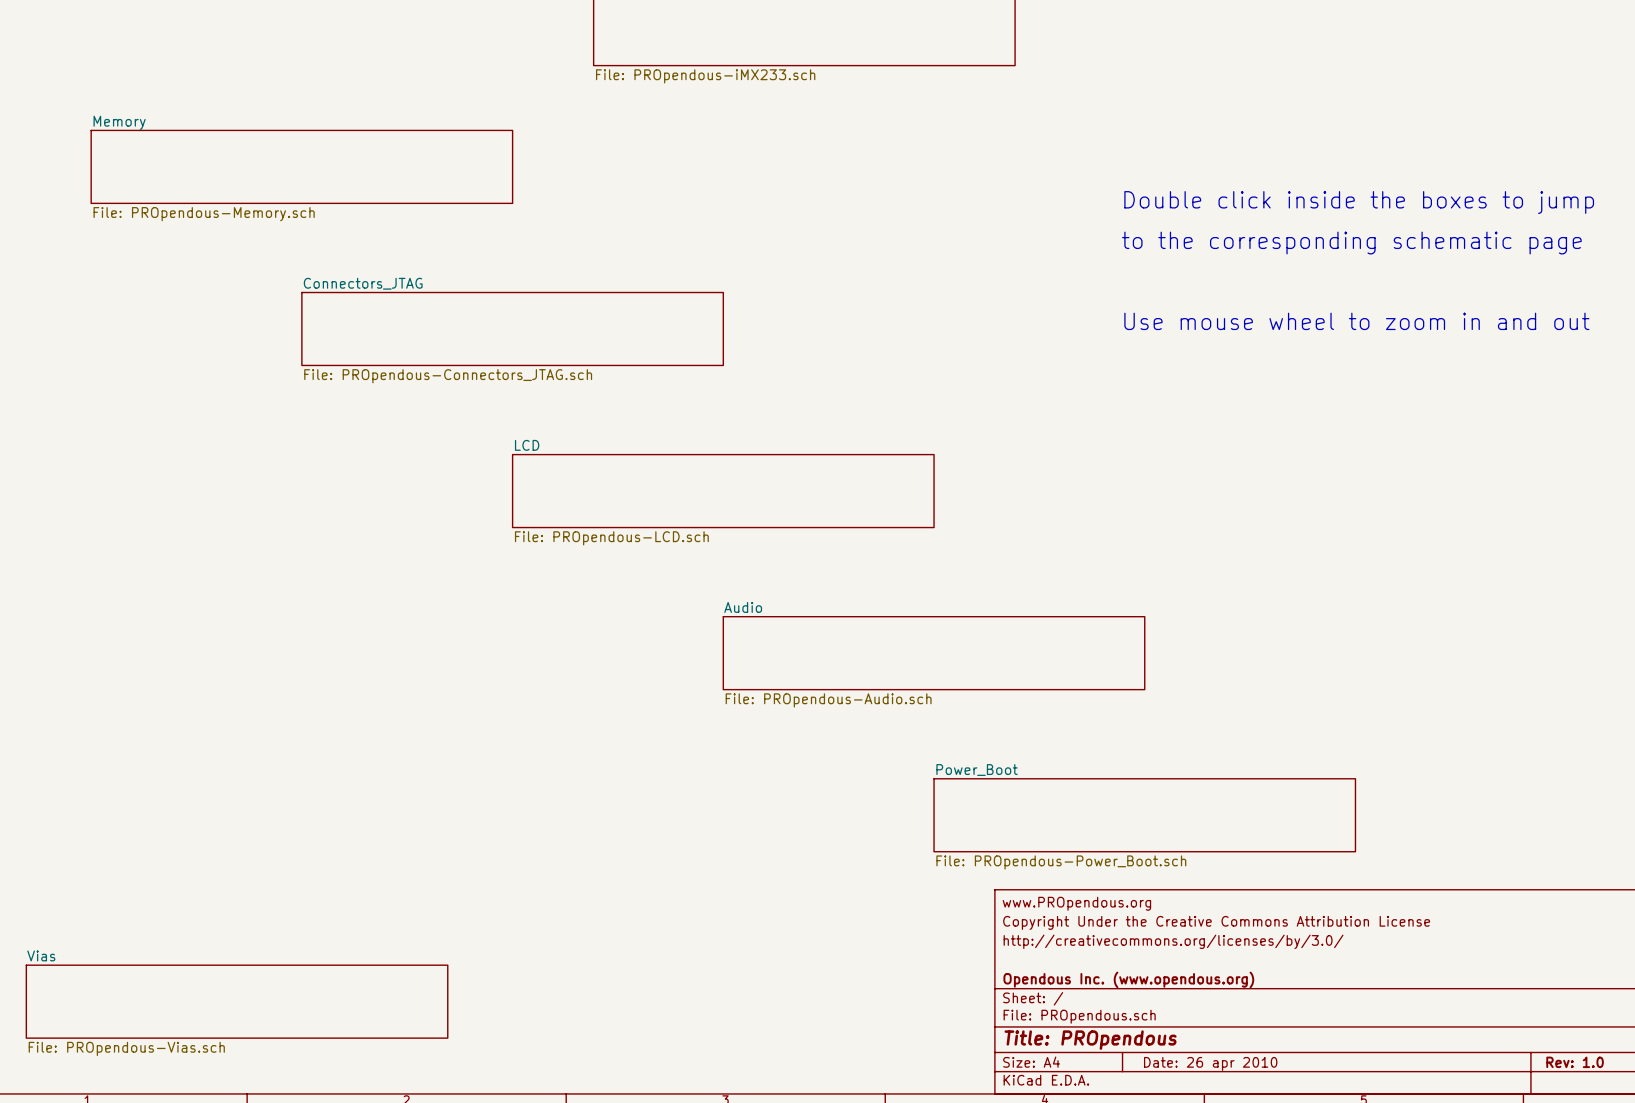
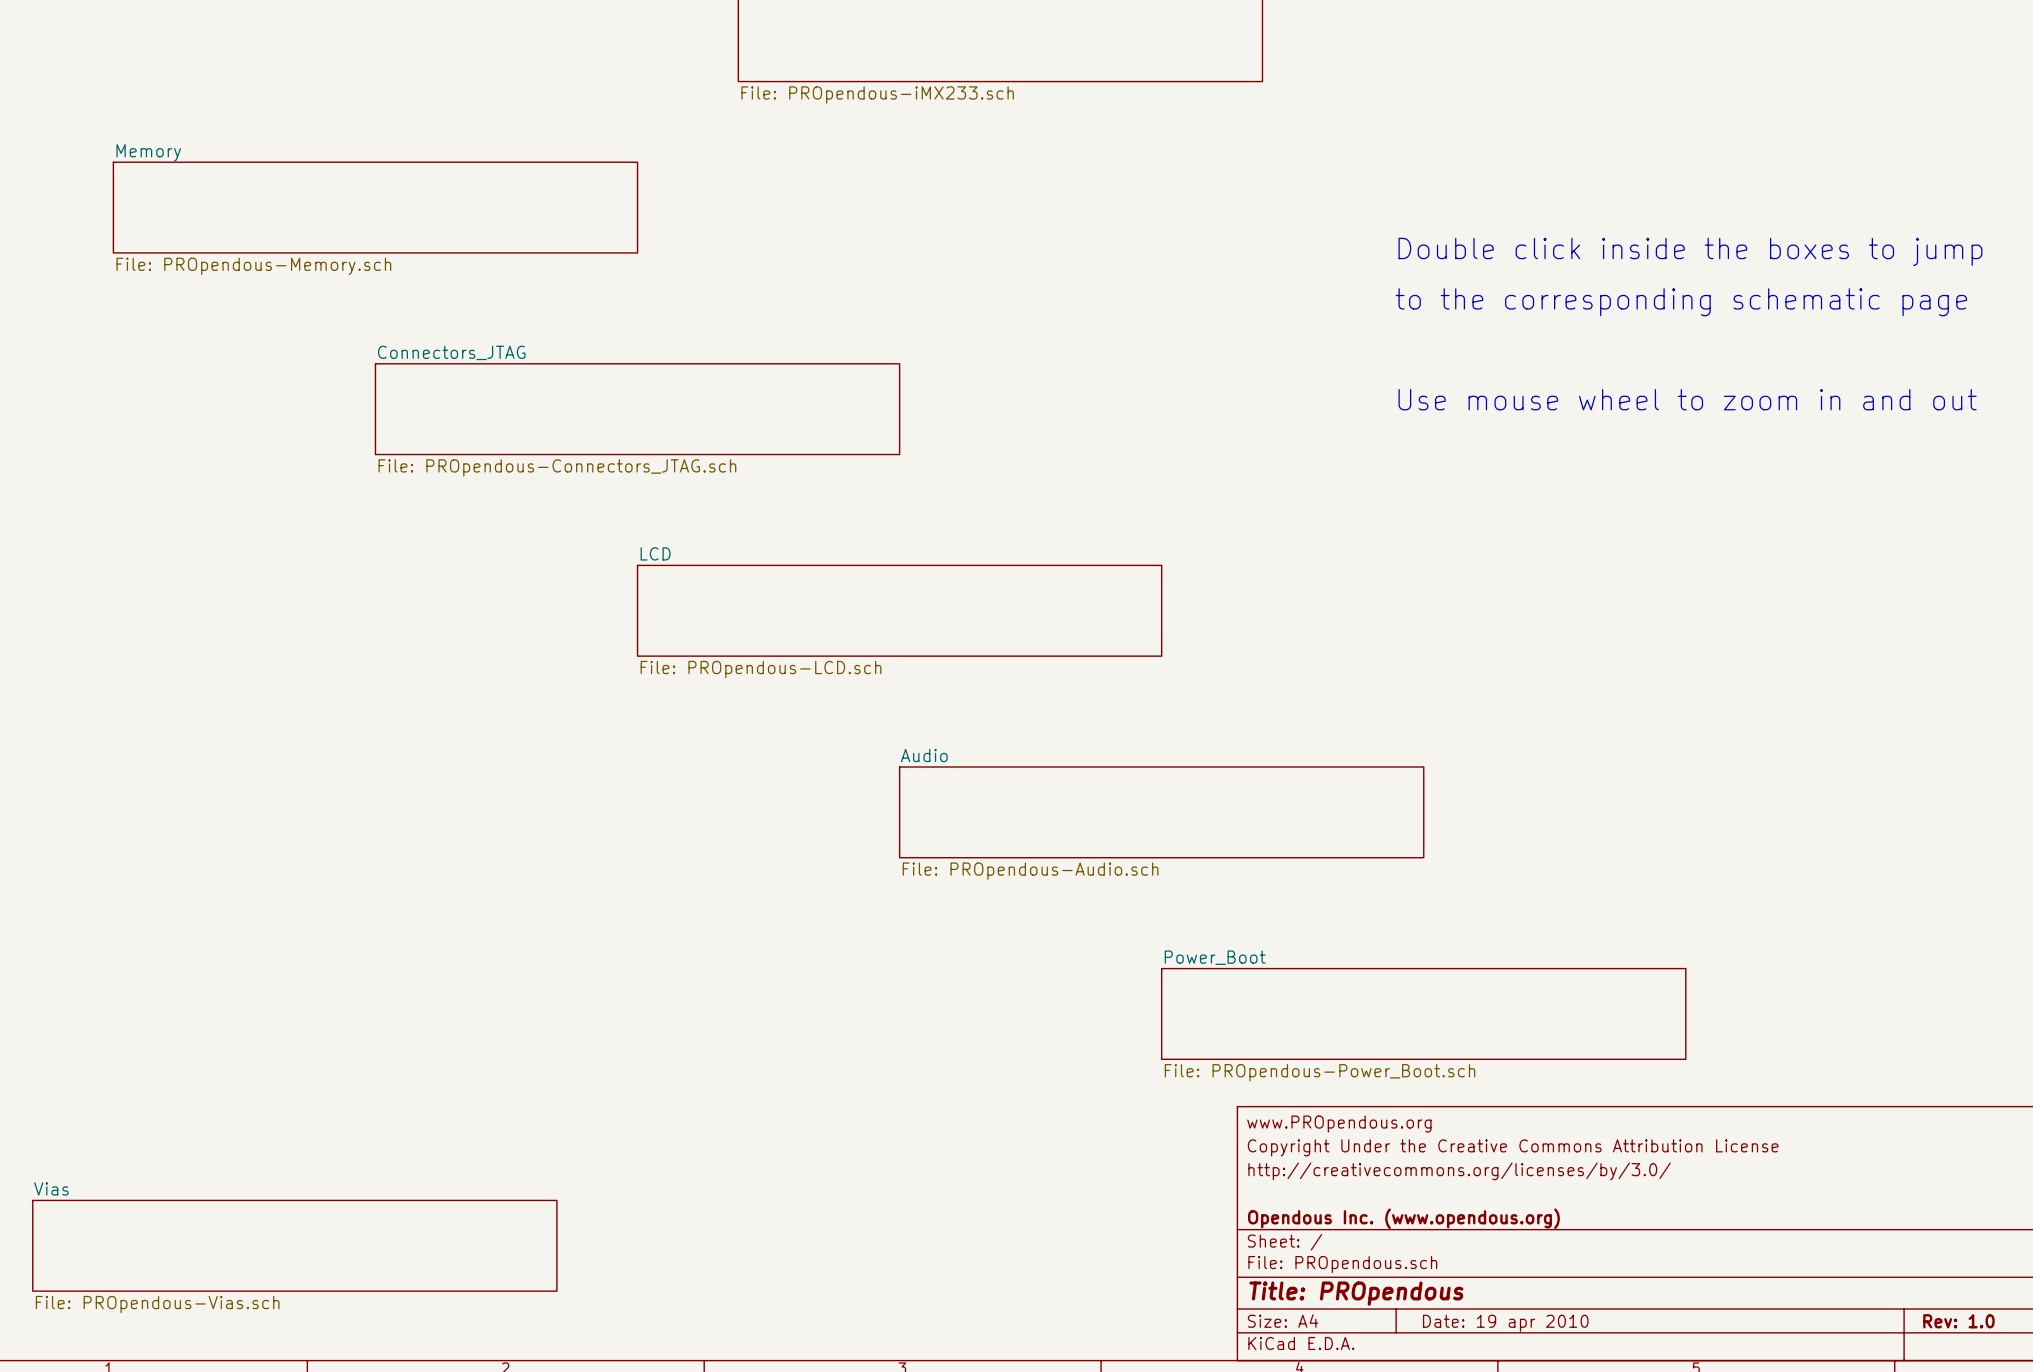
title block: Date: 26 apr 2010 (1210, 1063) -> Date: 19 apr 2010 (1505, 1323)

